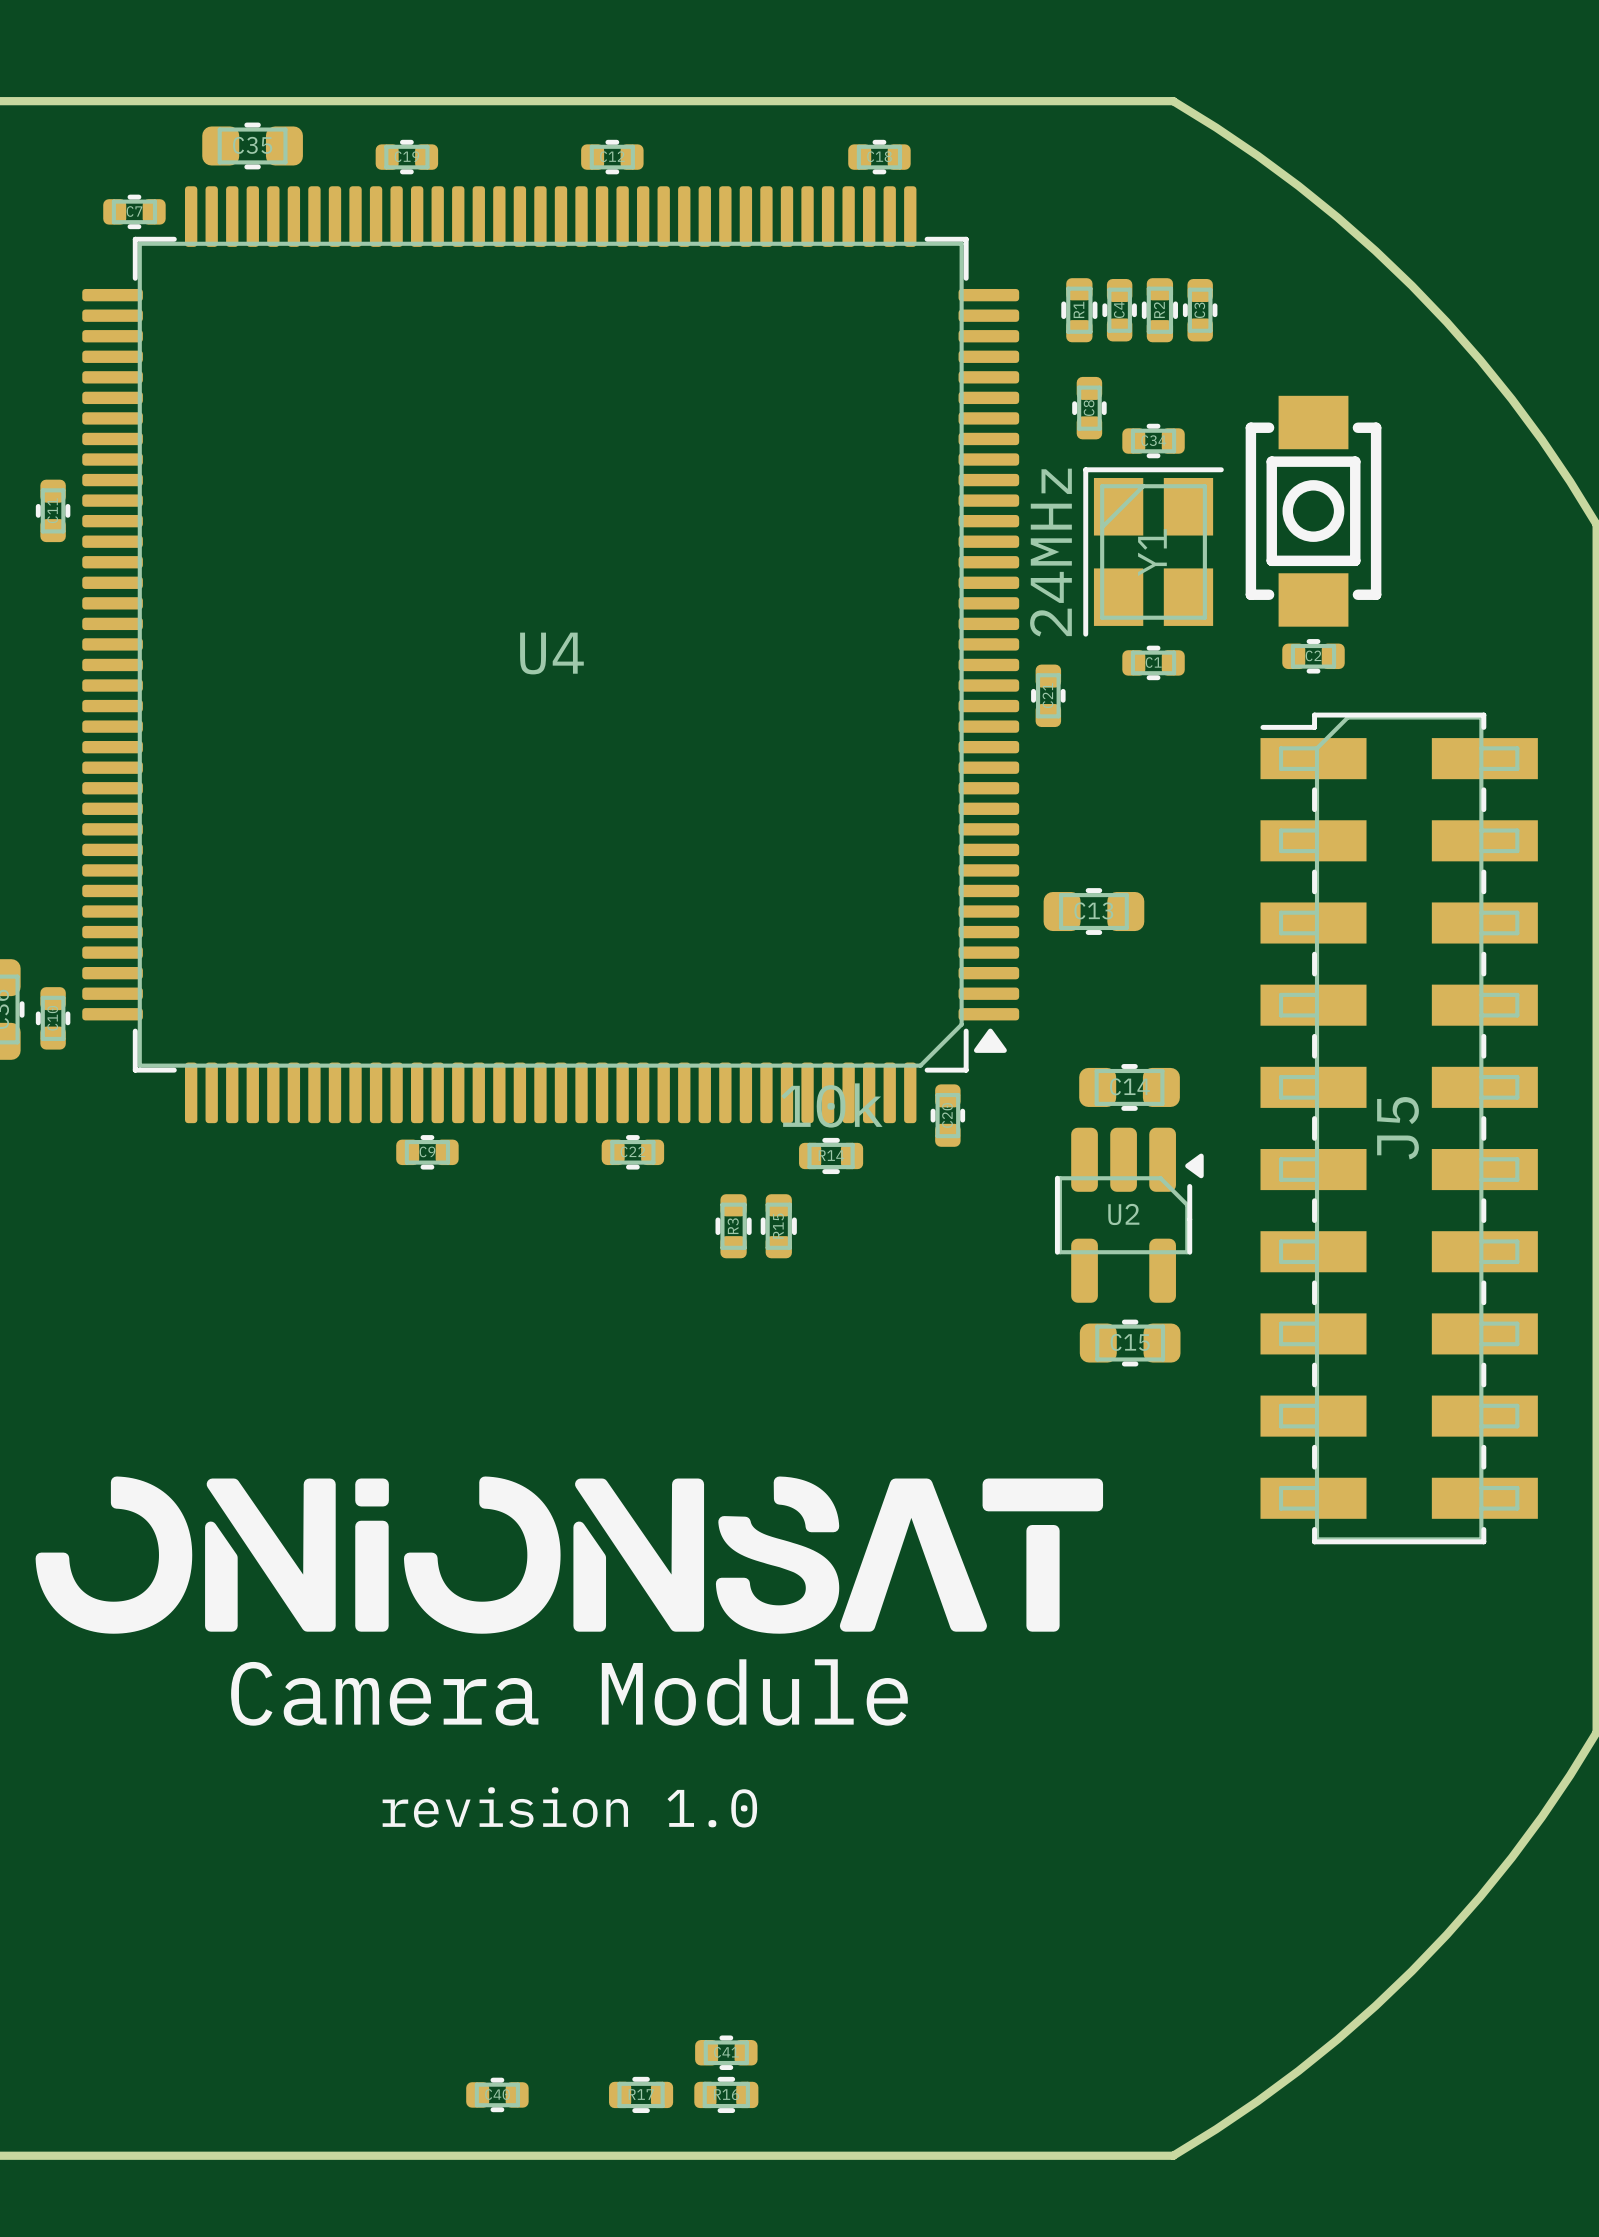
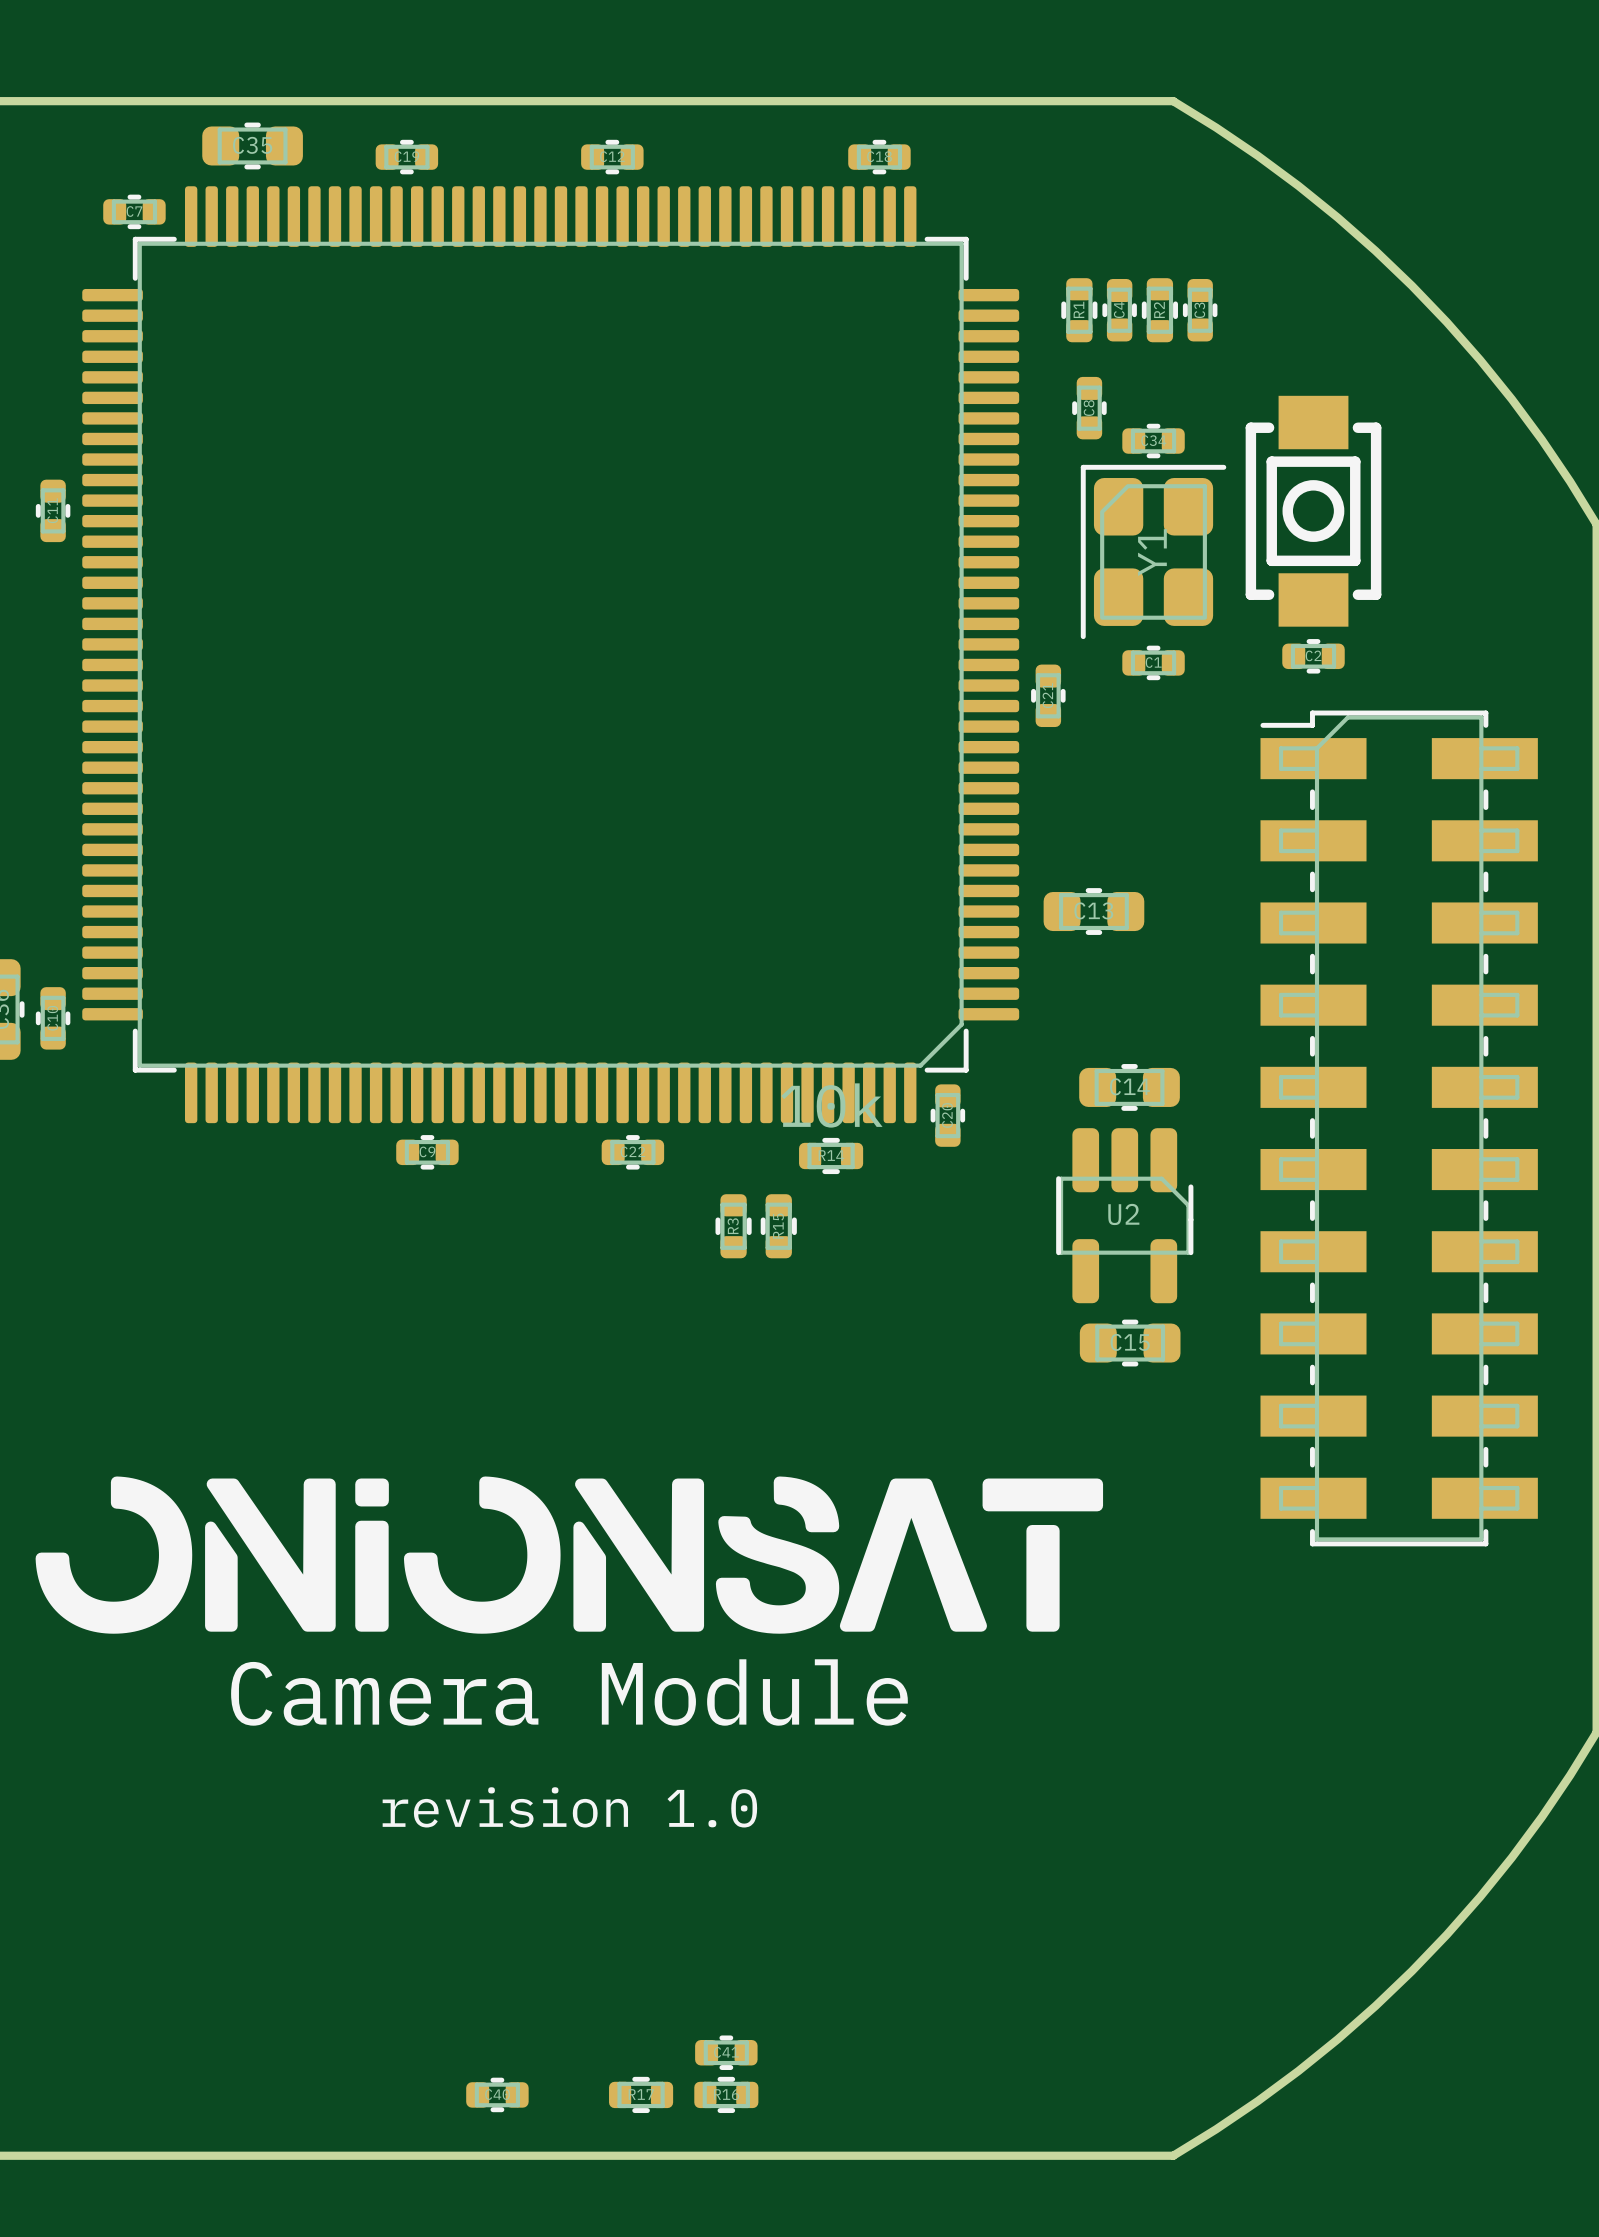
Y1 footprint: [1083, 467, 1224, 637] -> [1080, 464, 1227, 640]
Y1 value: 24MHz (1050, 552) -> none
U4: (550, 654) -> none
U2 footprint: [1054, 1127, 1204, 1303] -> [1056, 1128, 1194, 1304]
J5: (1399, 1128) -> none
part: none -> (1399, 1128)

